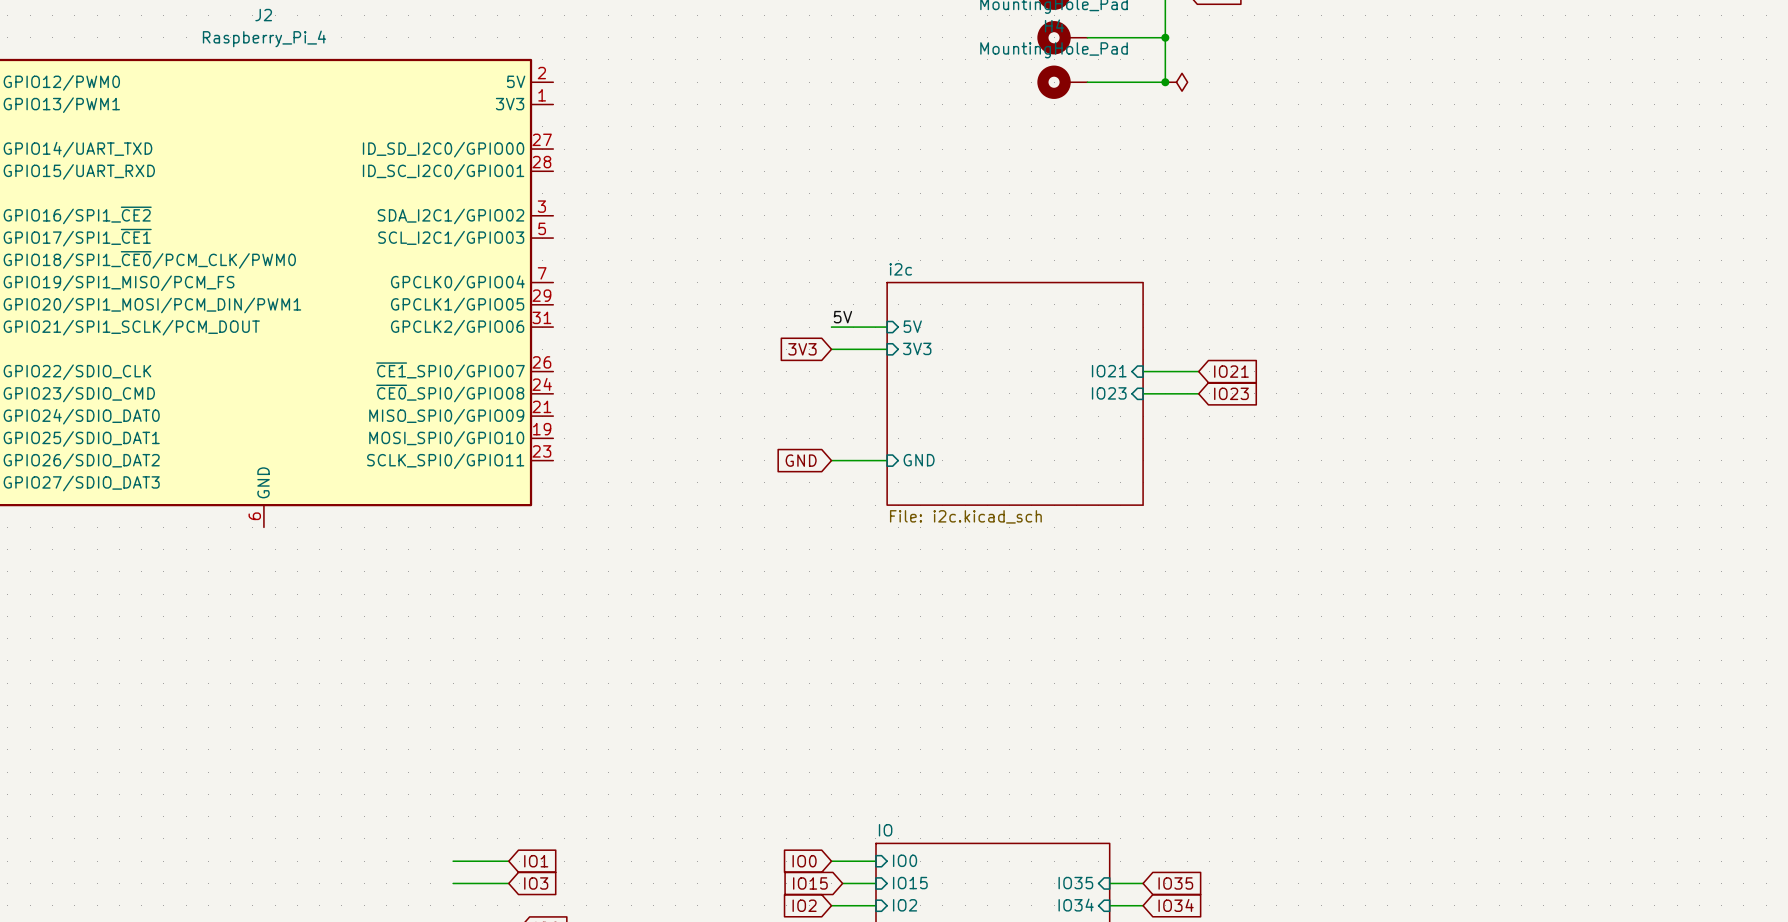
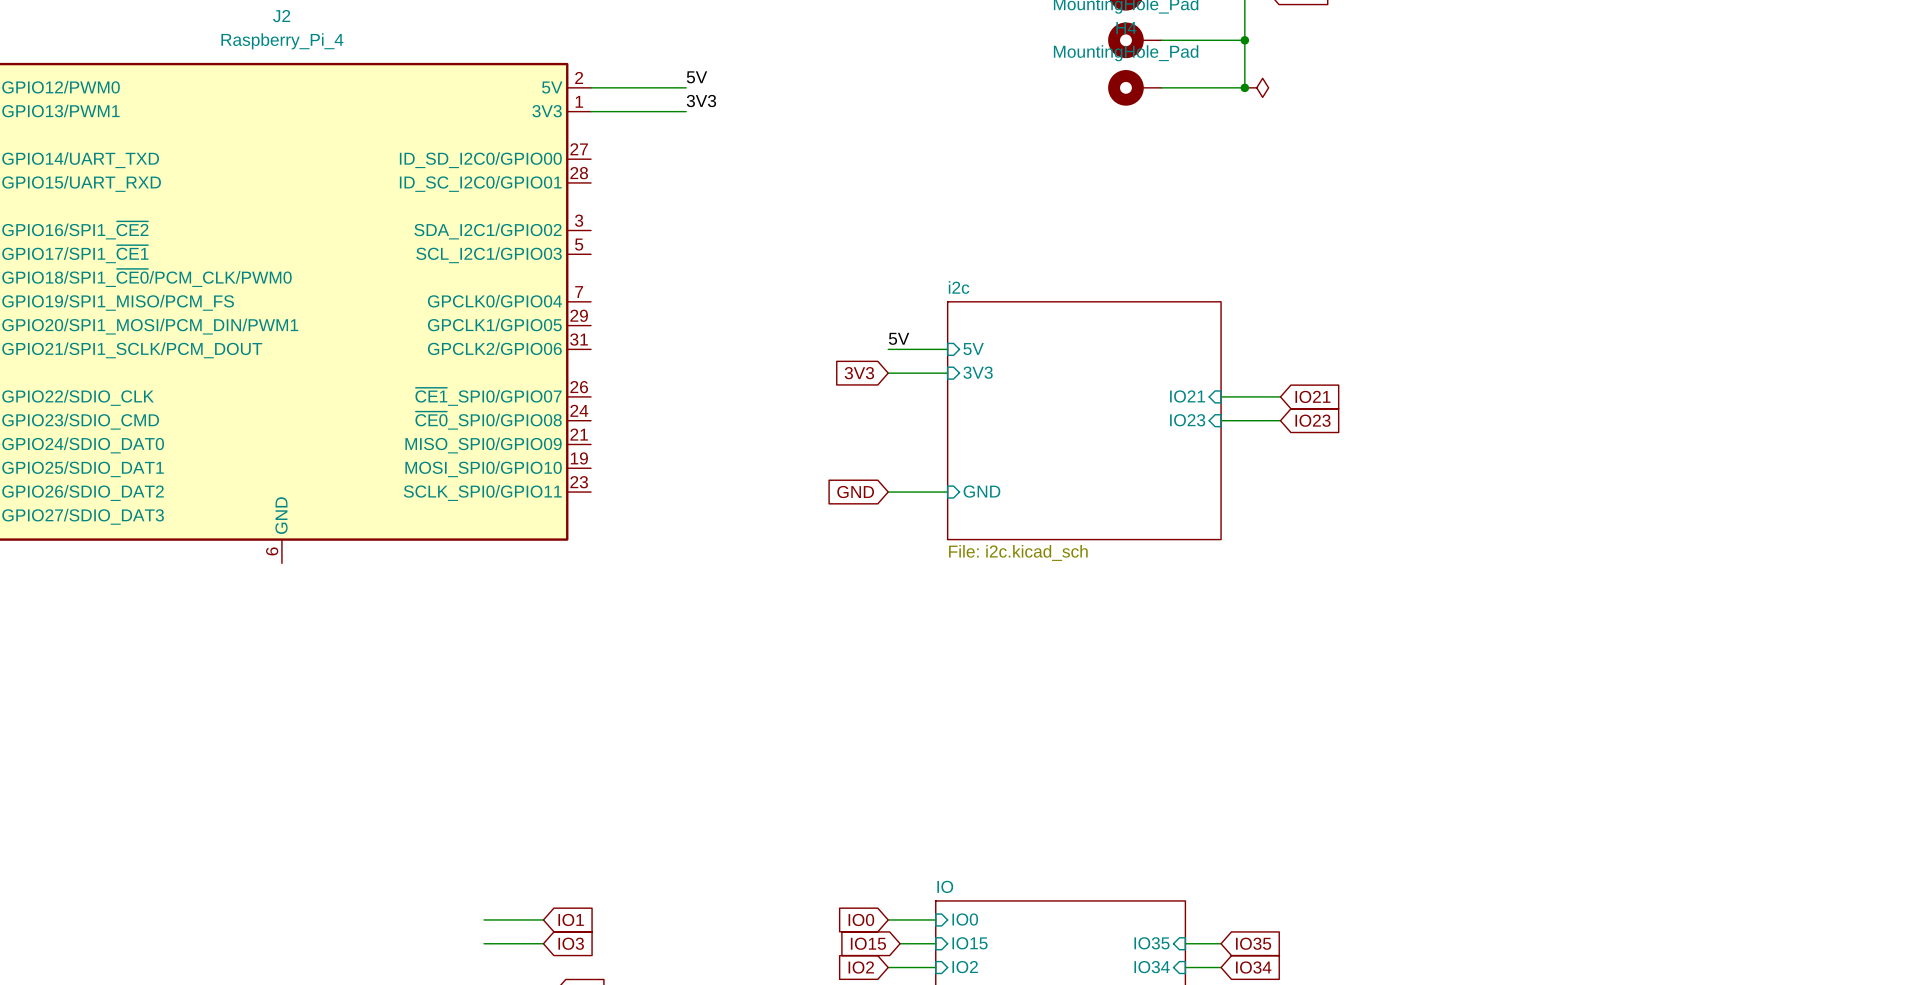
label: none -> 5V (697, 77)
wire: none -> (591, 87) (686, 87)
label: none -> 3V3 (701, 101)
wire: none -> (591, 111) (686, 111)

